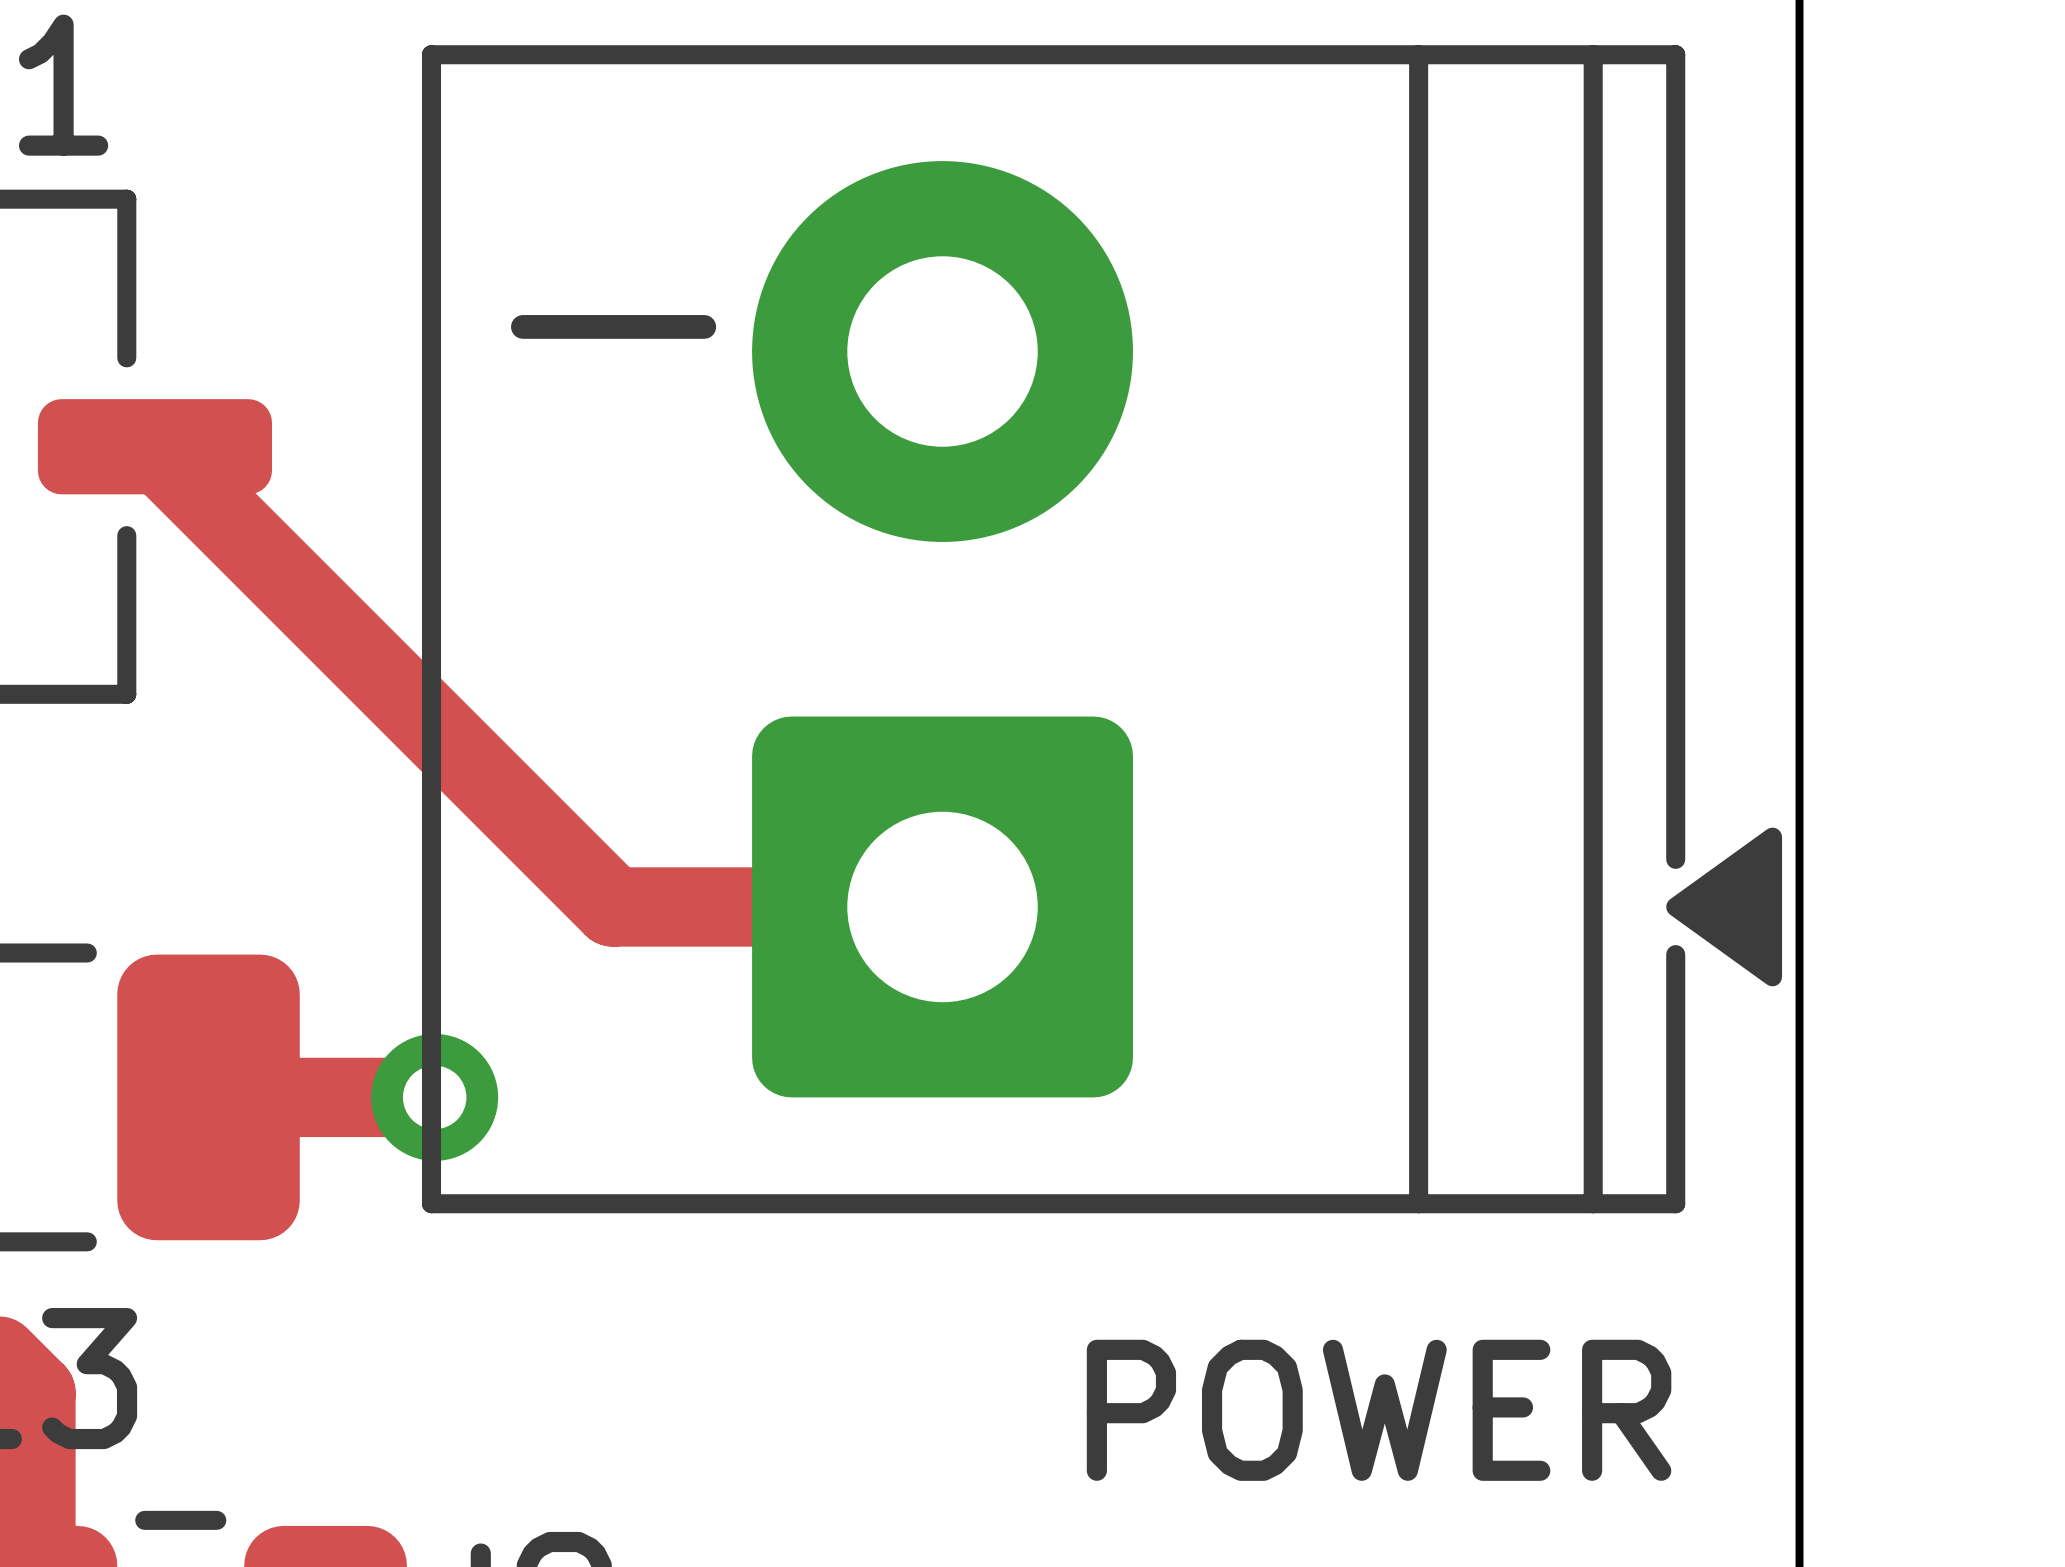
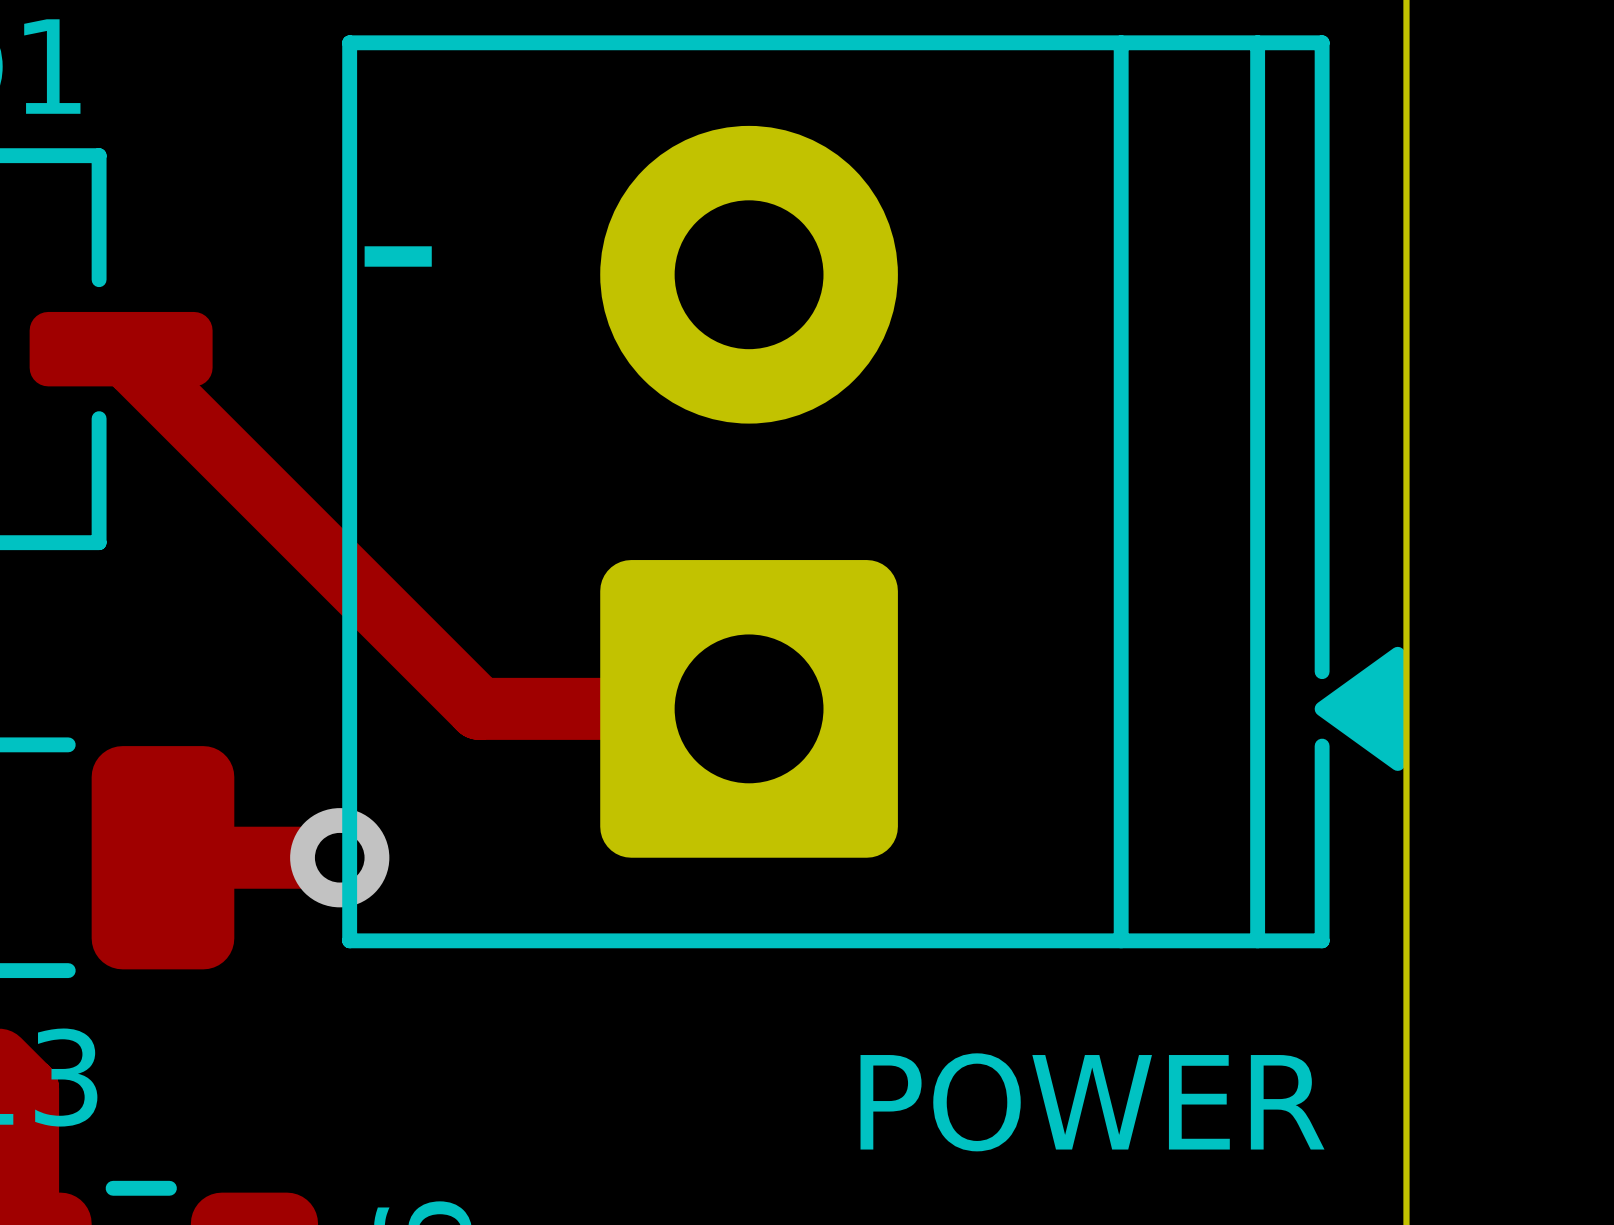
part position: (1102, 629) -> (873, 491)

